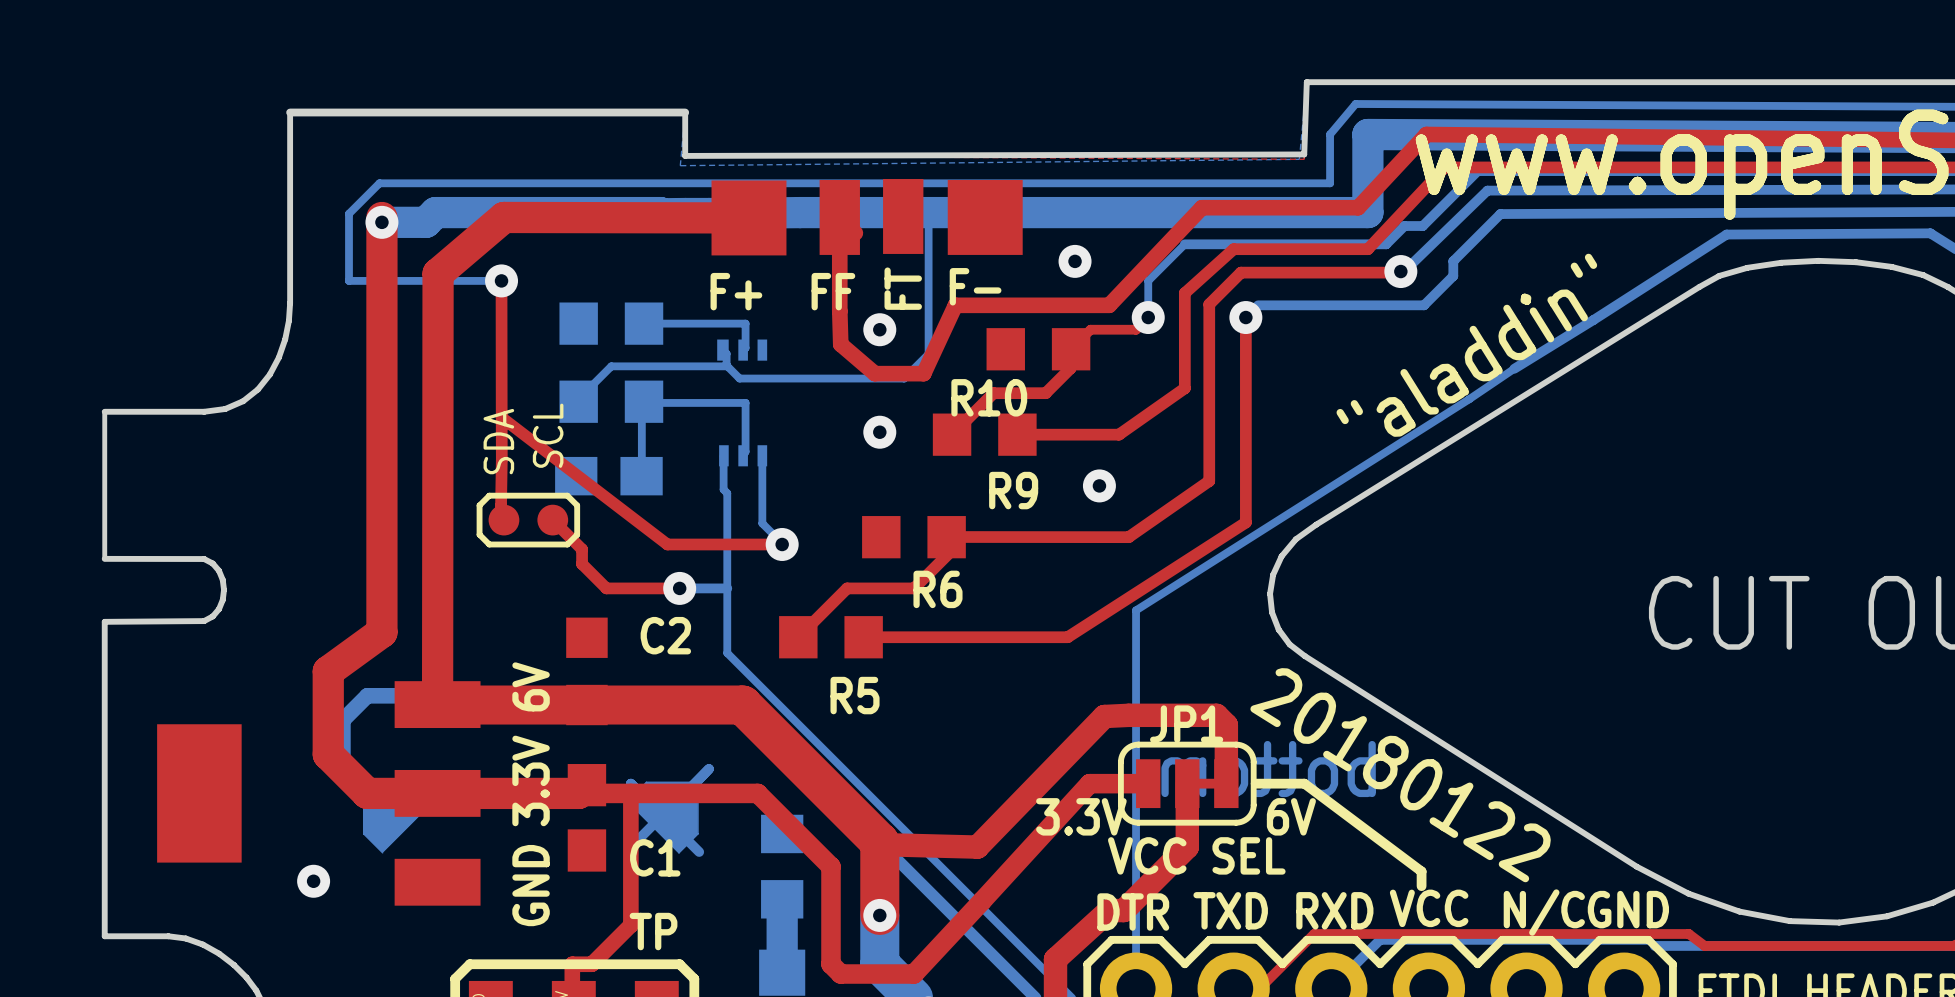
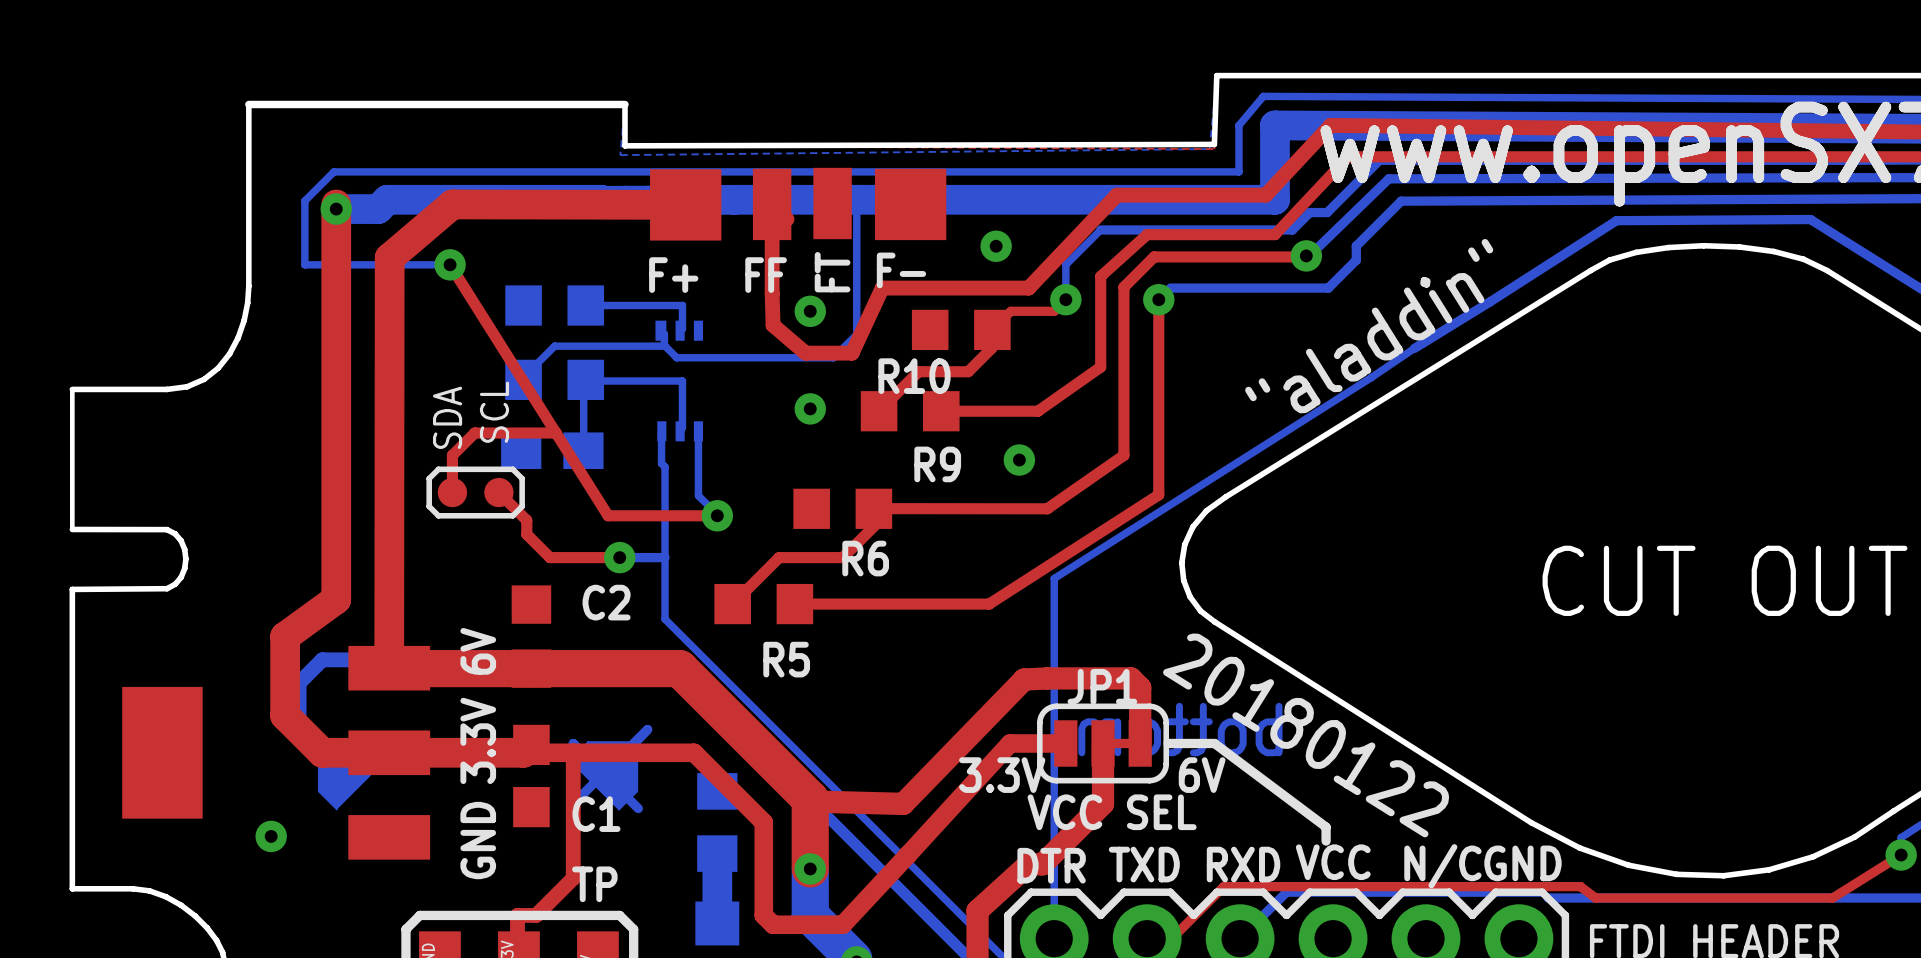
top track: (501, 280) (501, 417) -> none
top track: (501, 417) (501, 505) (503, 520) -> (556, 433) (474, 433) (452, 455) (452, 492)
top track: (501, 417) (667, 544) -> (450, 264) (608, 515)

